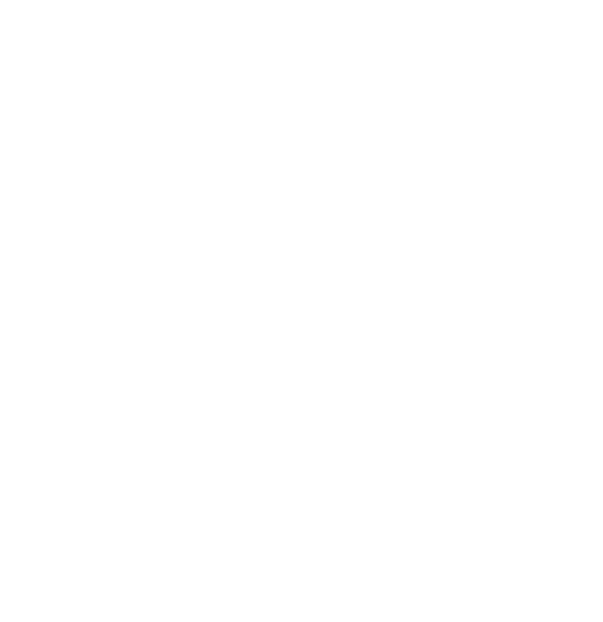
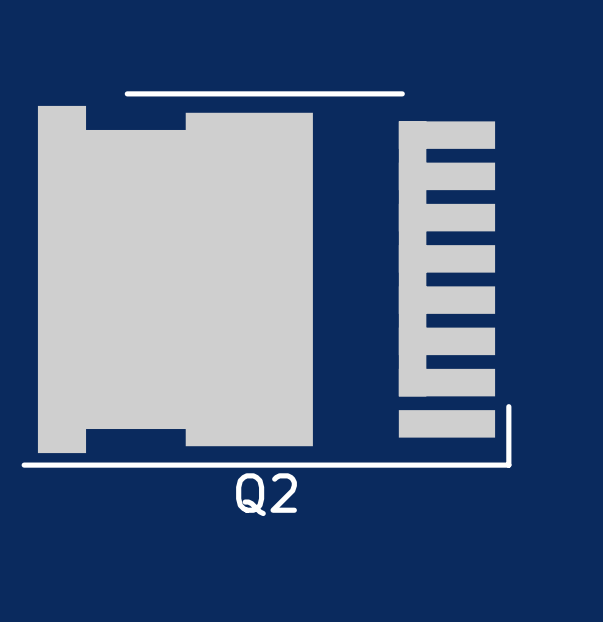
Q2: none -> (266, 279)

